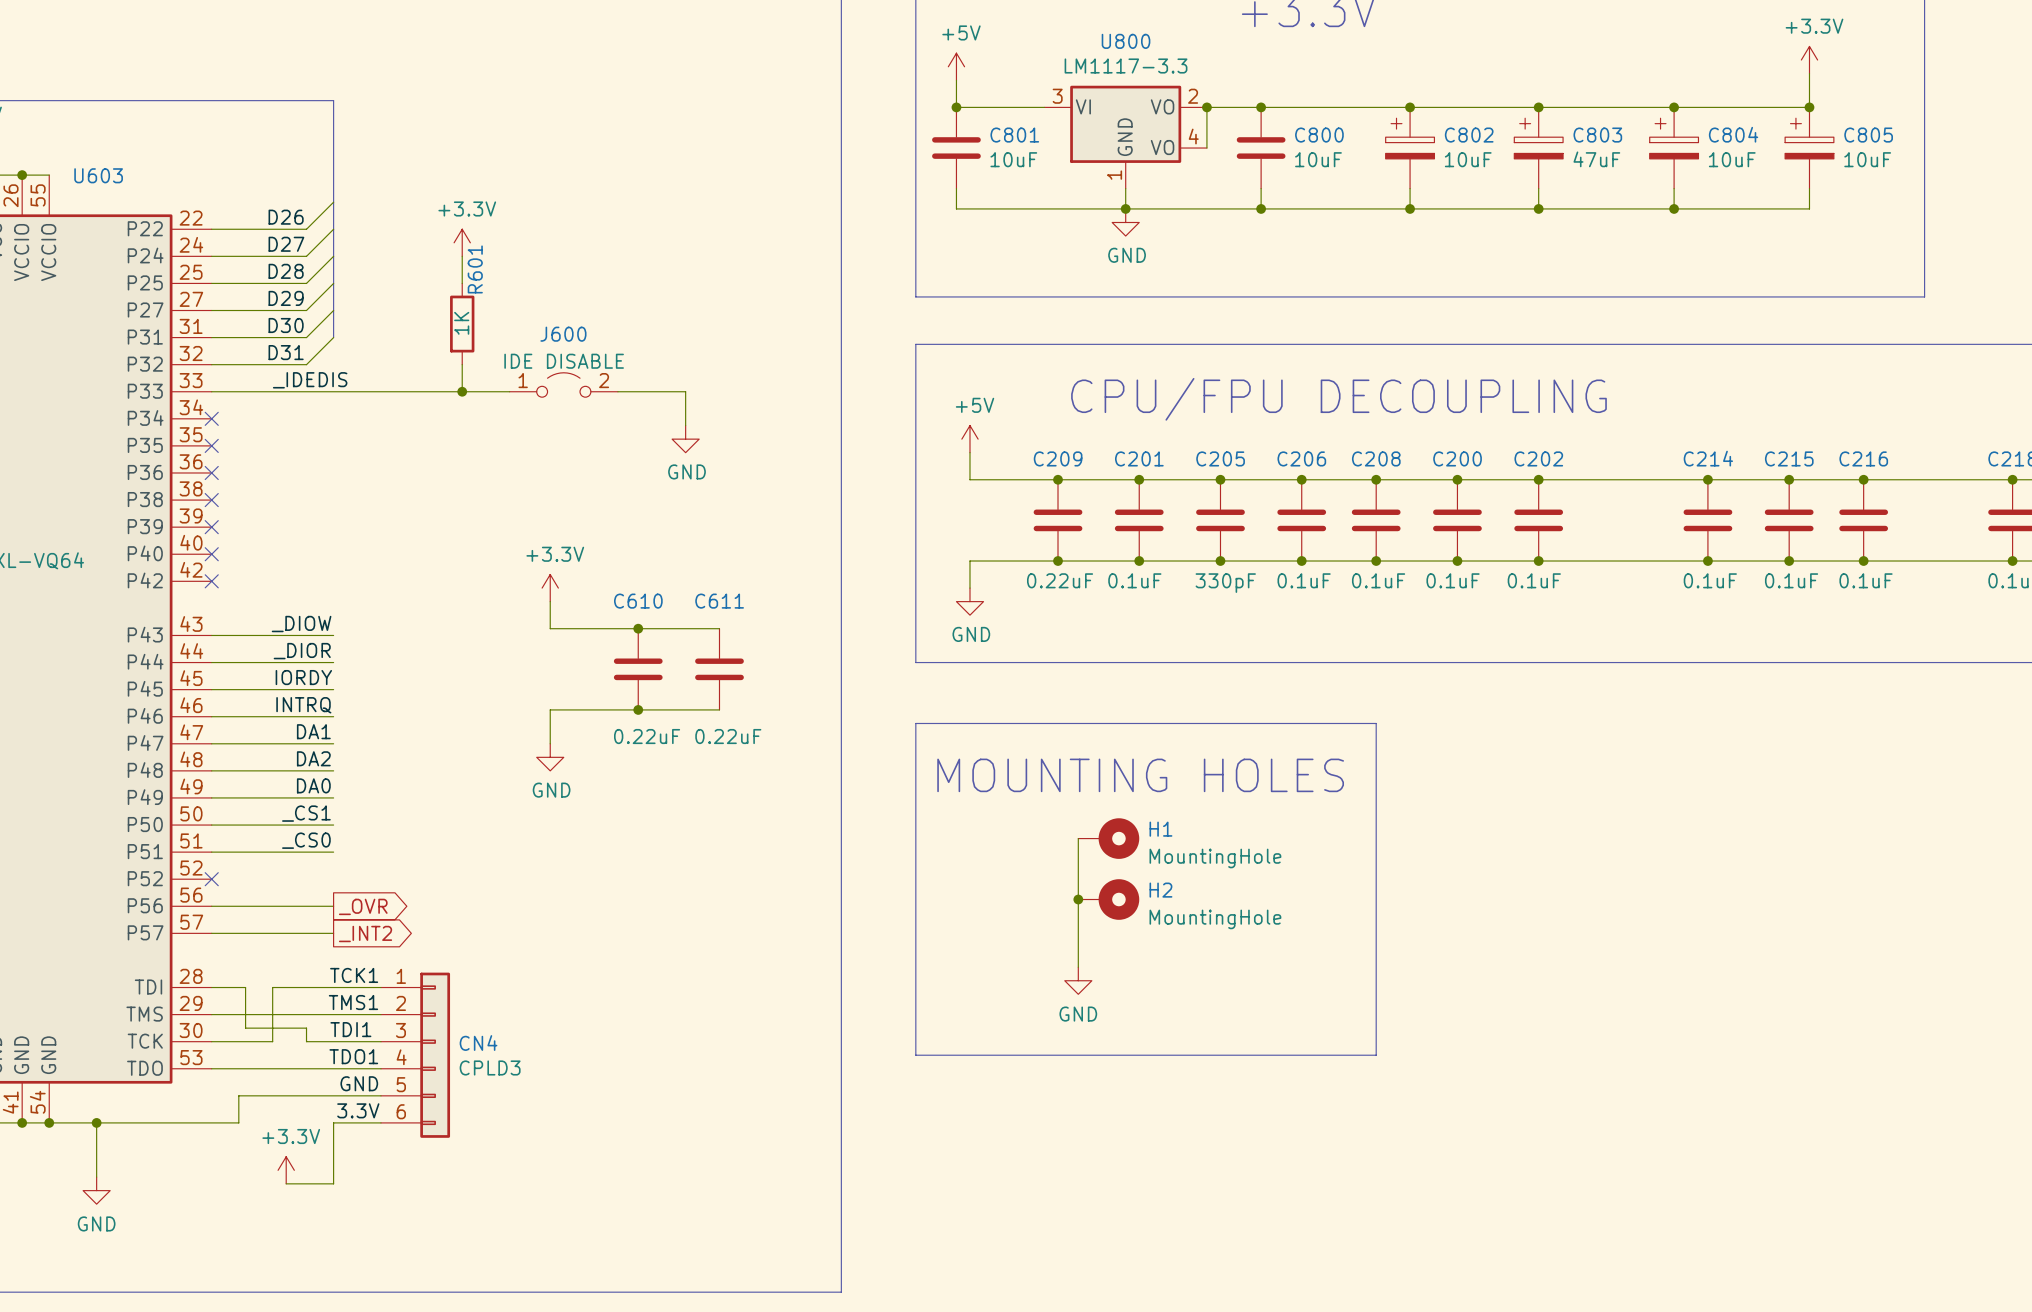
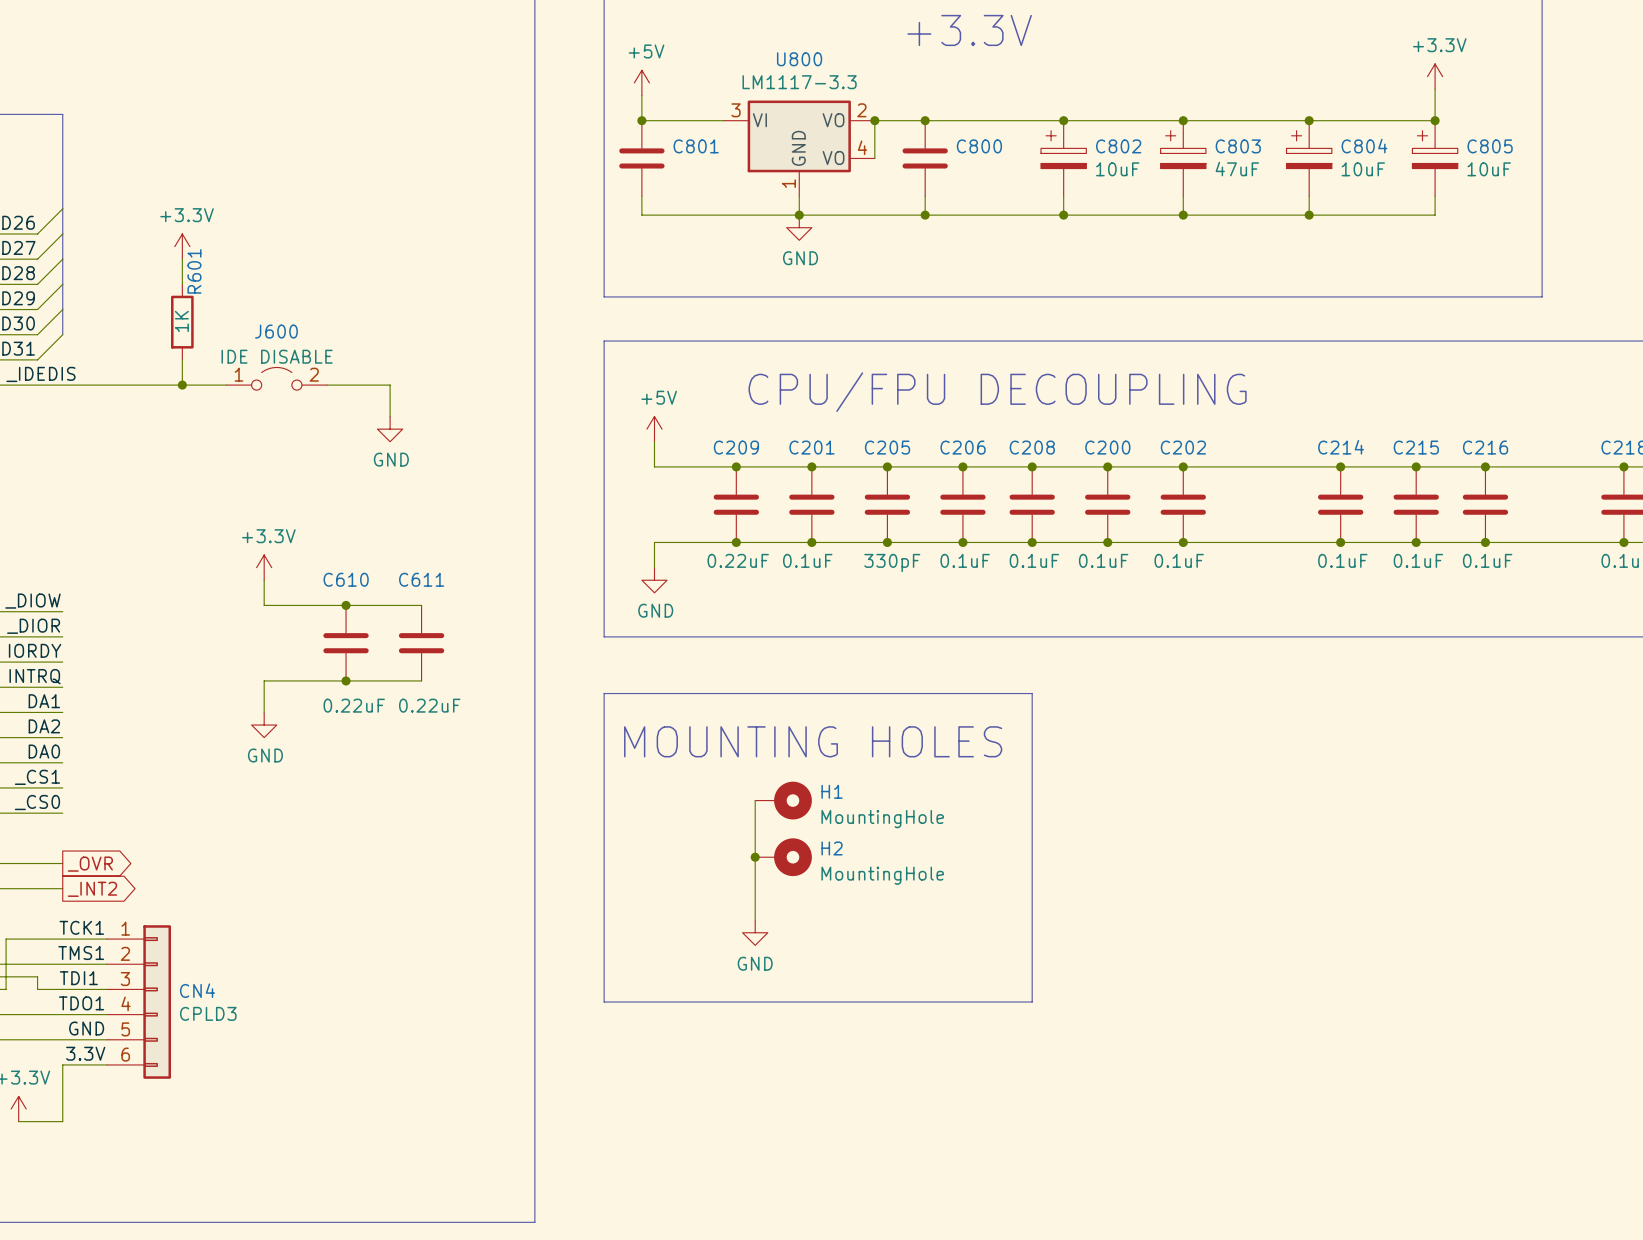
C801 value: 10uF (1013, 159) -> none
C800 value: 10uF (1318, 159) -> none

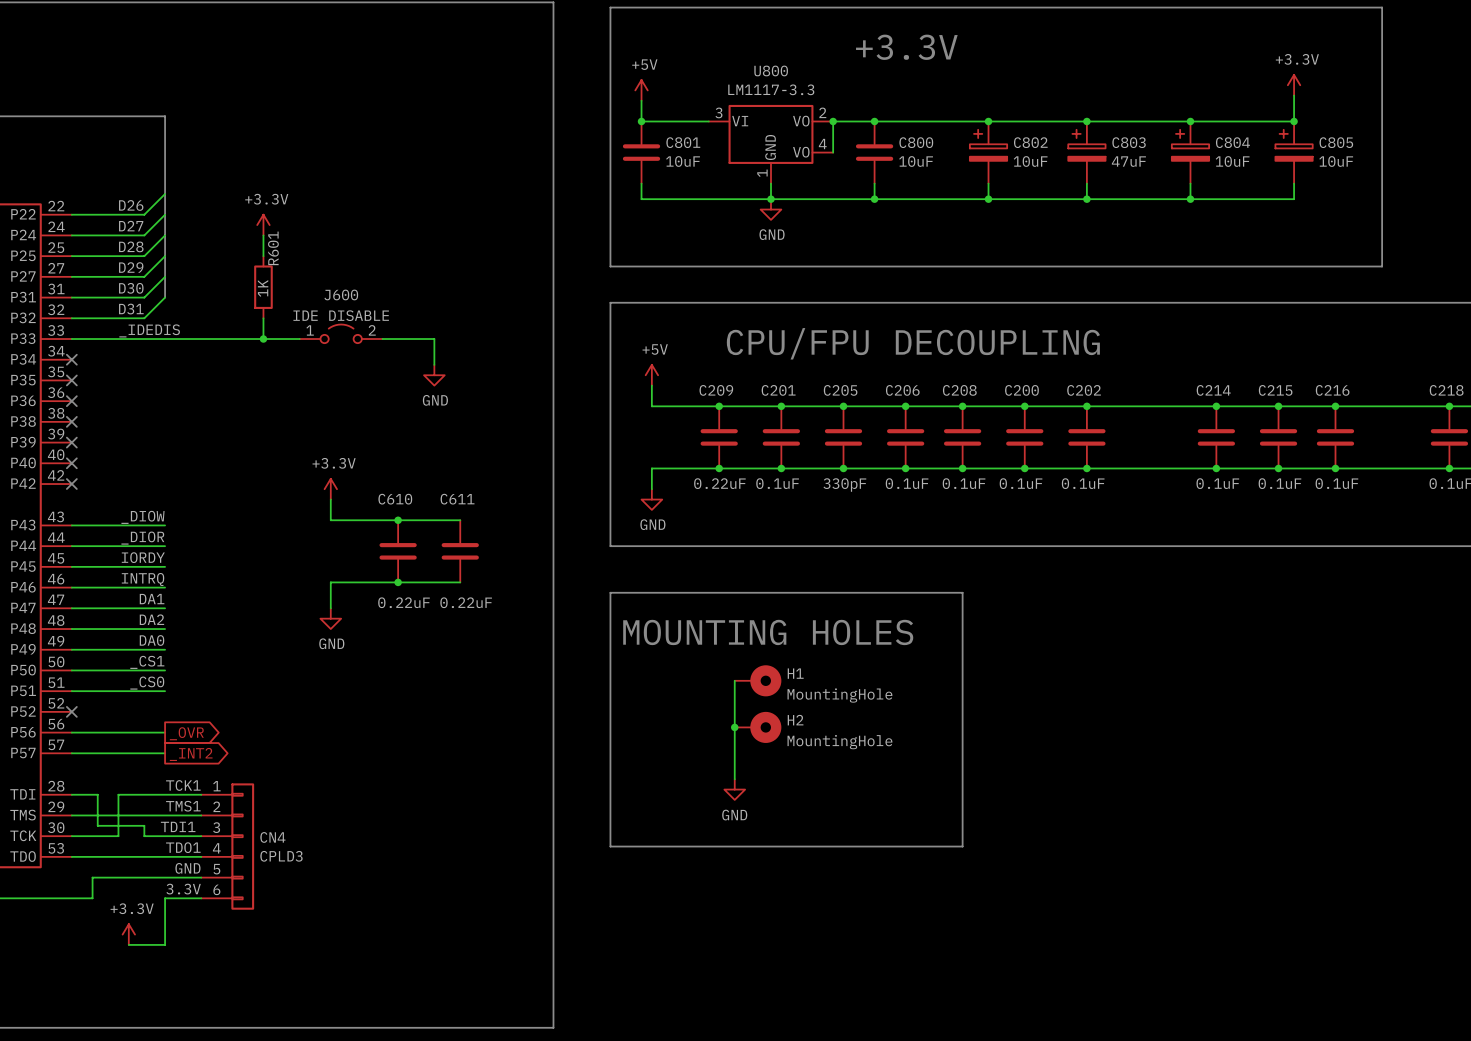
C801 value: none -> 10uF (683, 161)
C800 value: none -> 10uF (916, 161)

